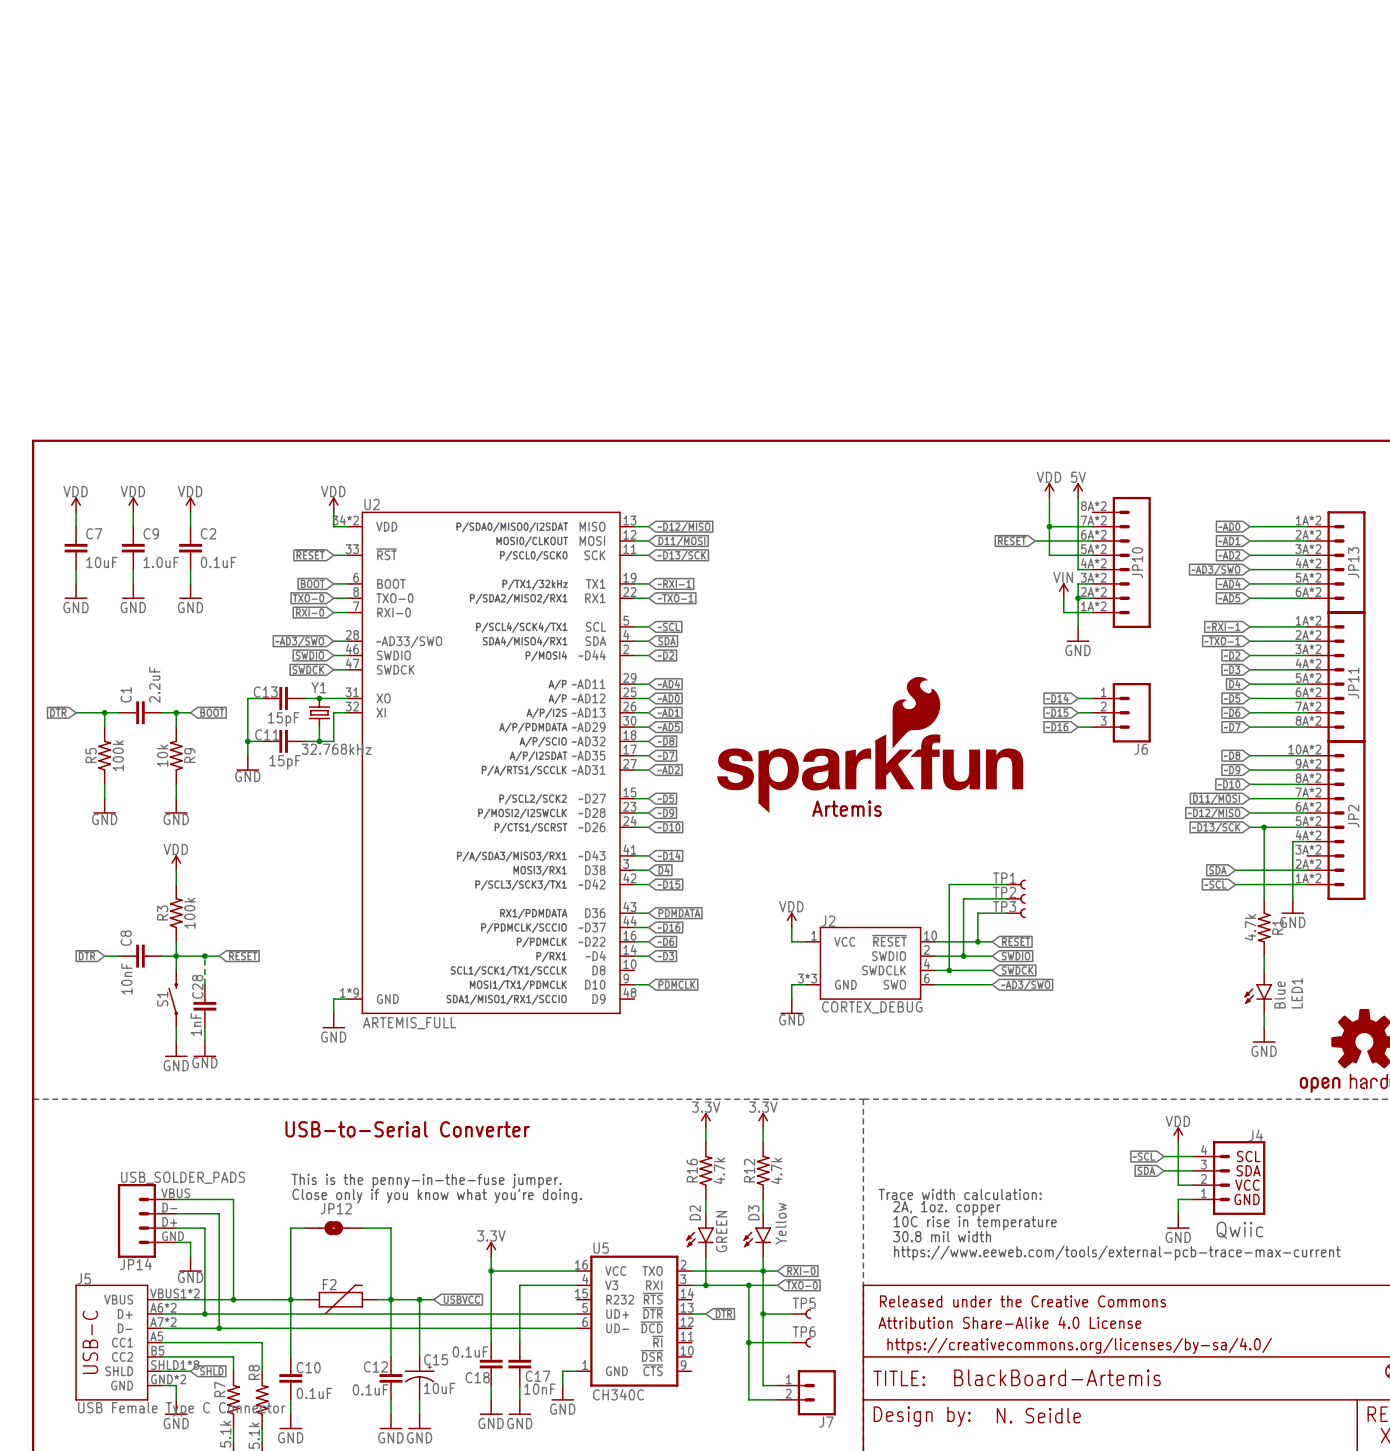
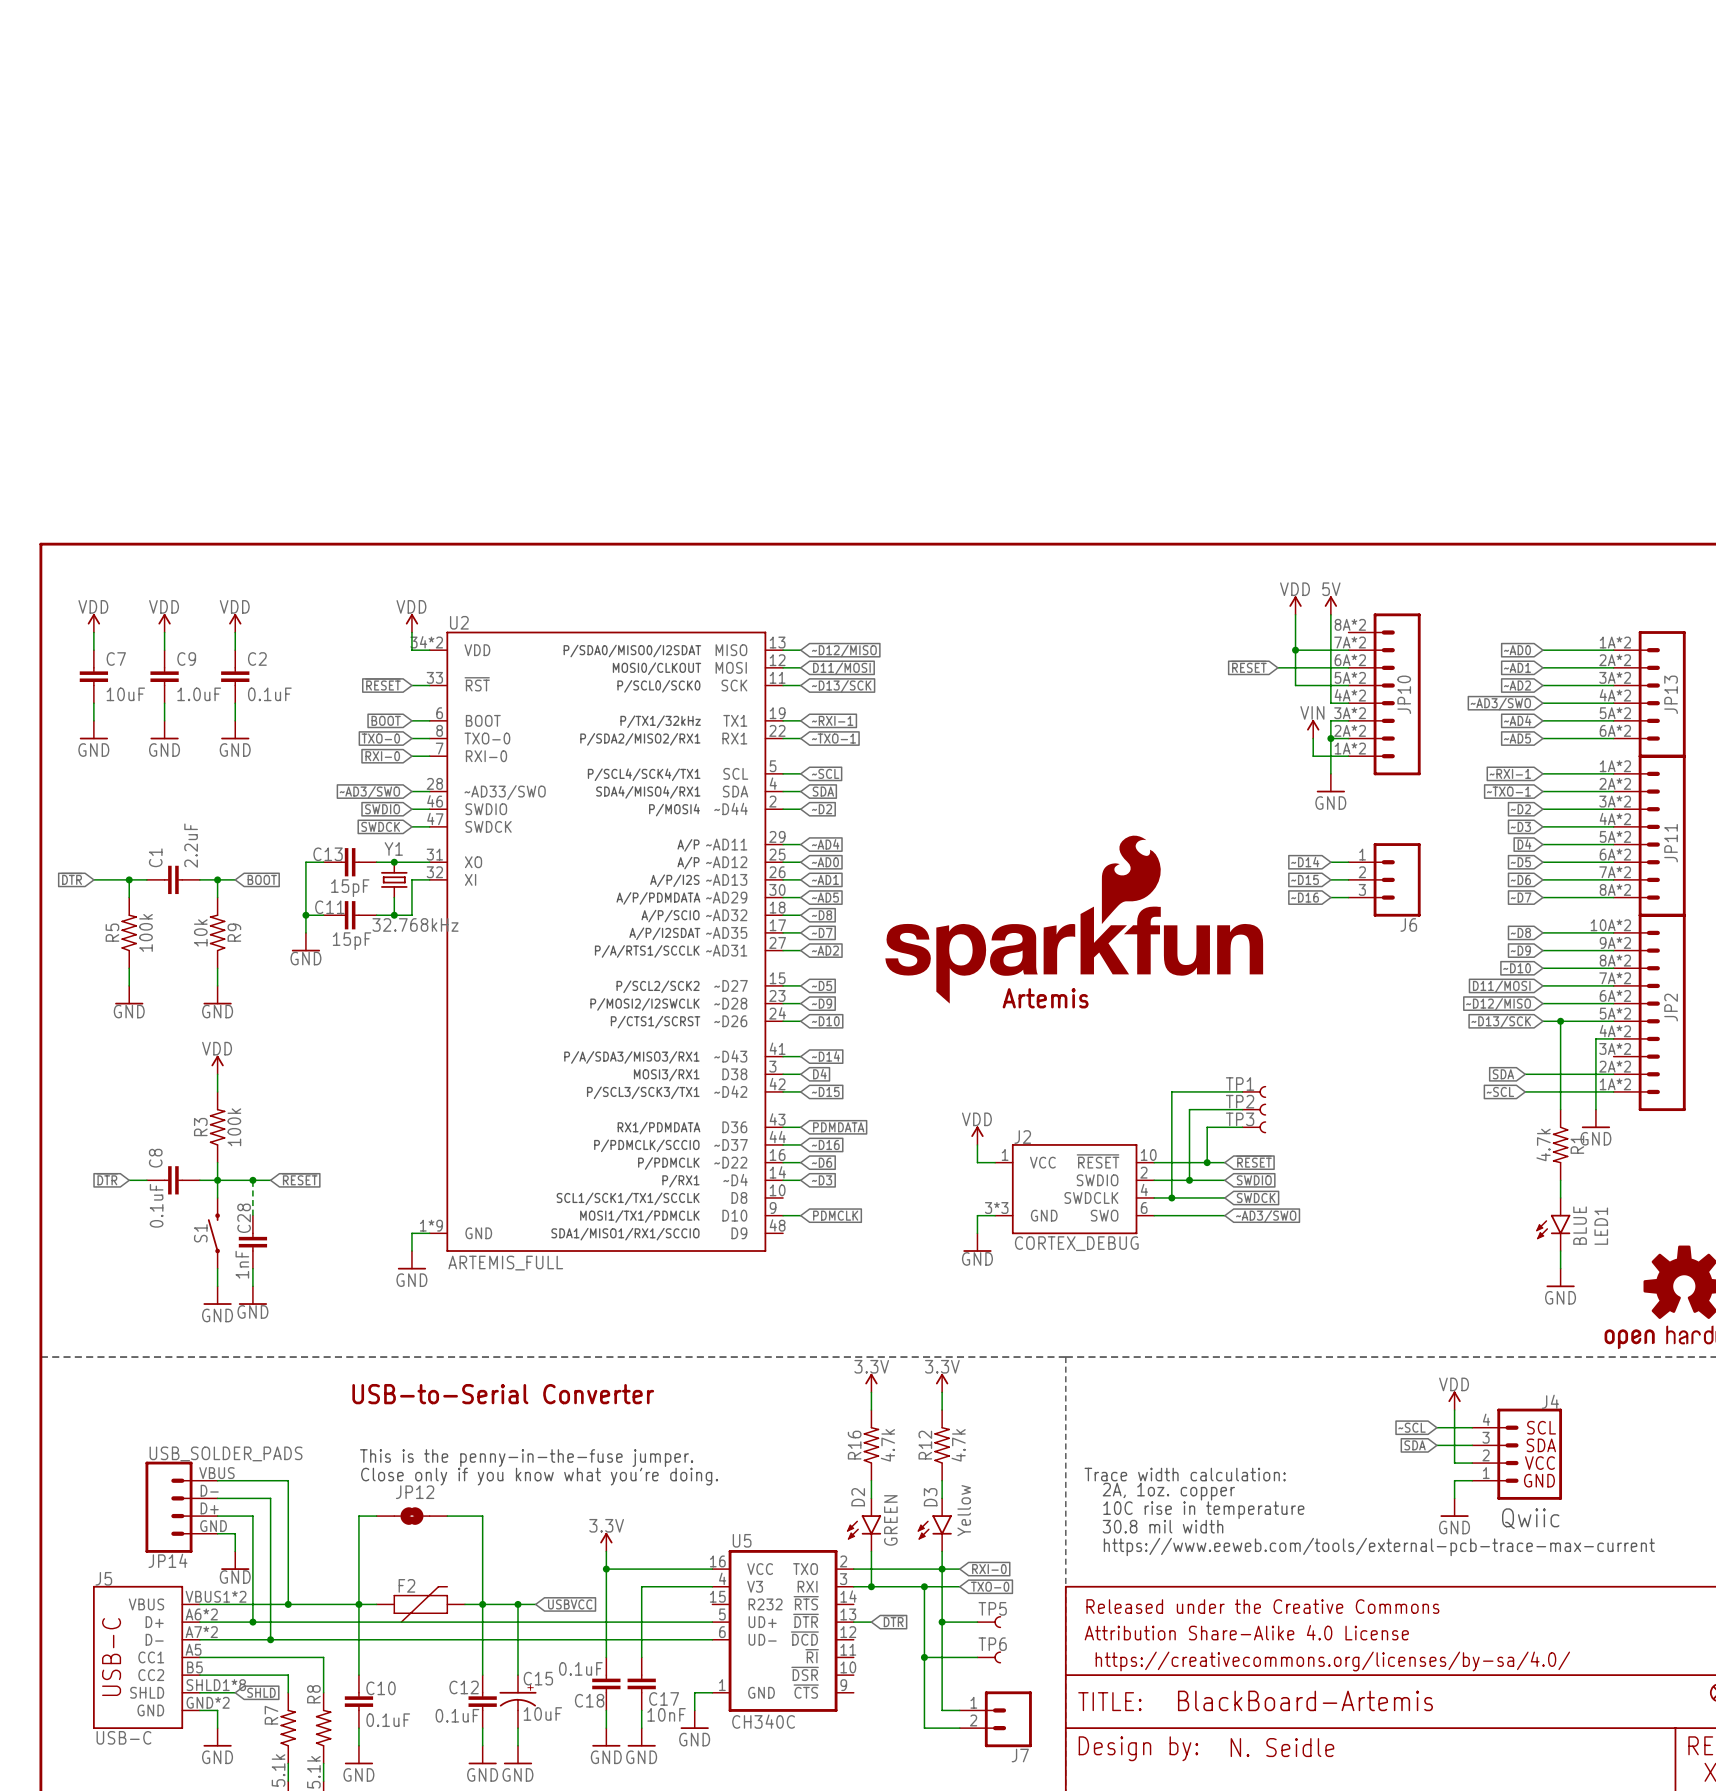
C8 value: 10nF (126, 978) -> 0.1uF (156, 1205)
LED1 value: Blue (1279, 994) -> BLUE (1580, 1225)
J5 value: USB Female Type C Connector (181, 1409) -> USB-C (123, 1737)

